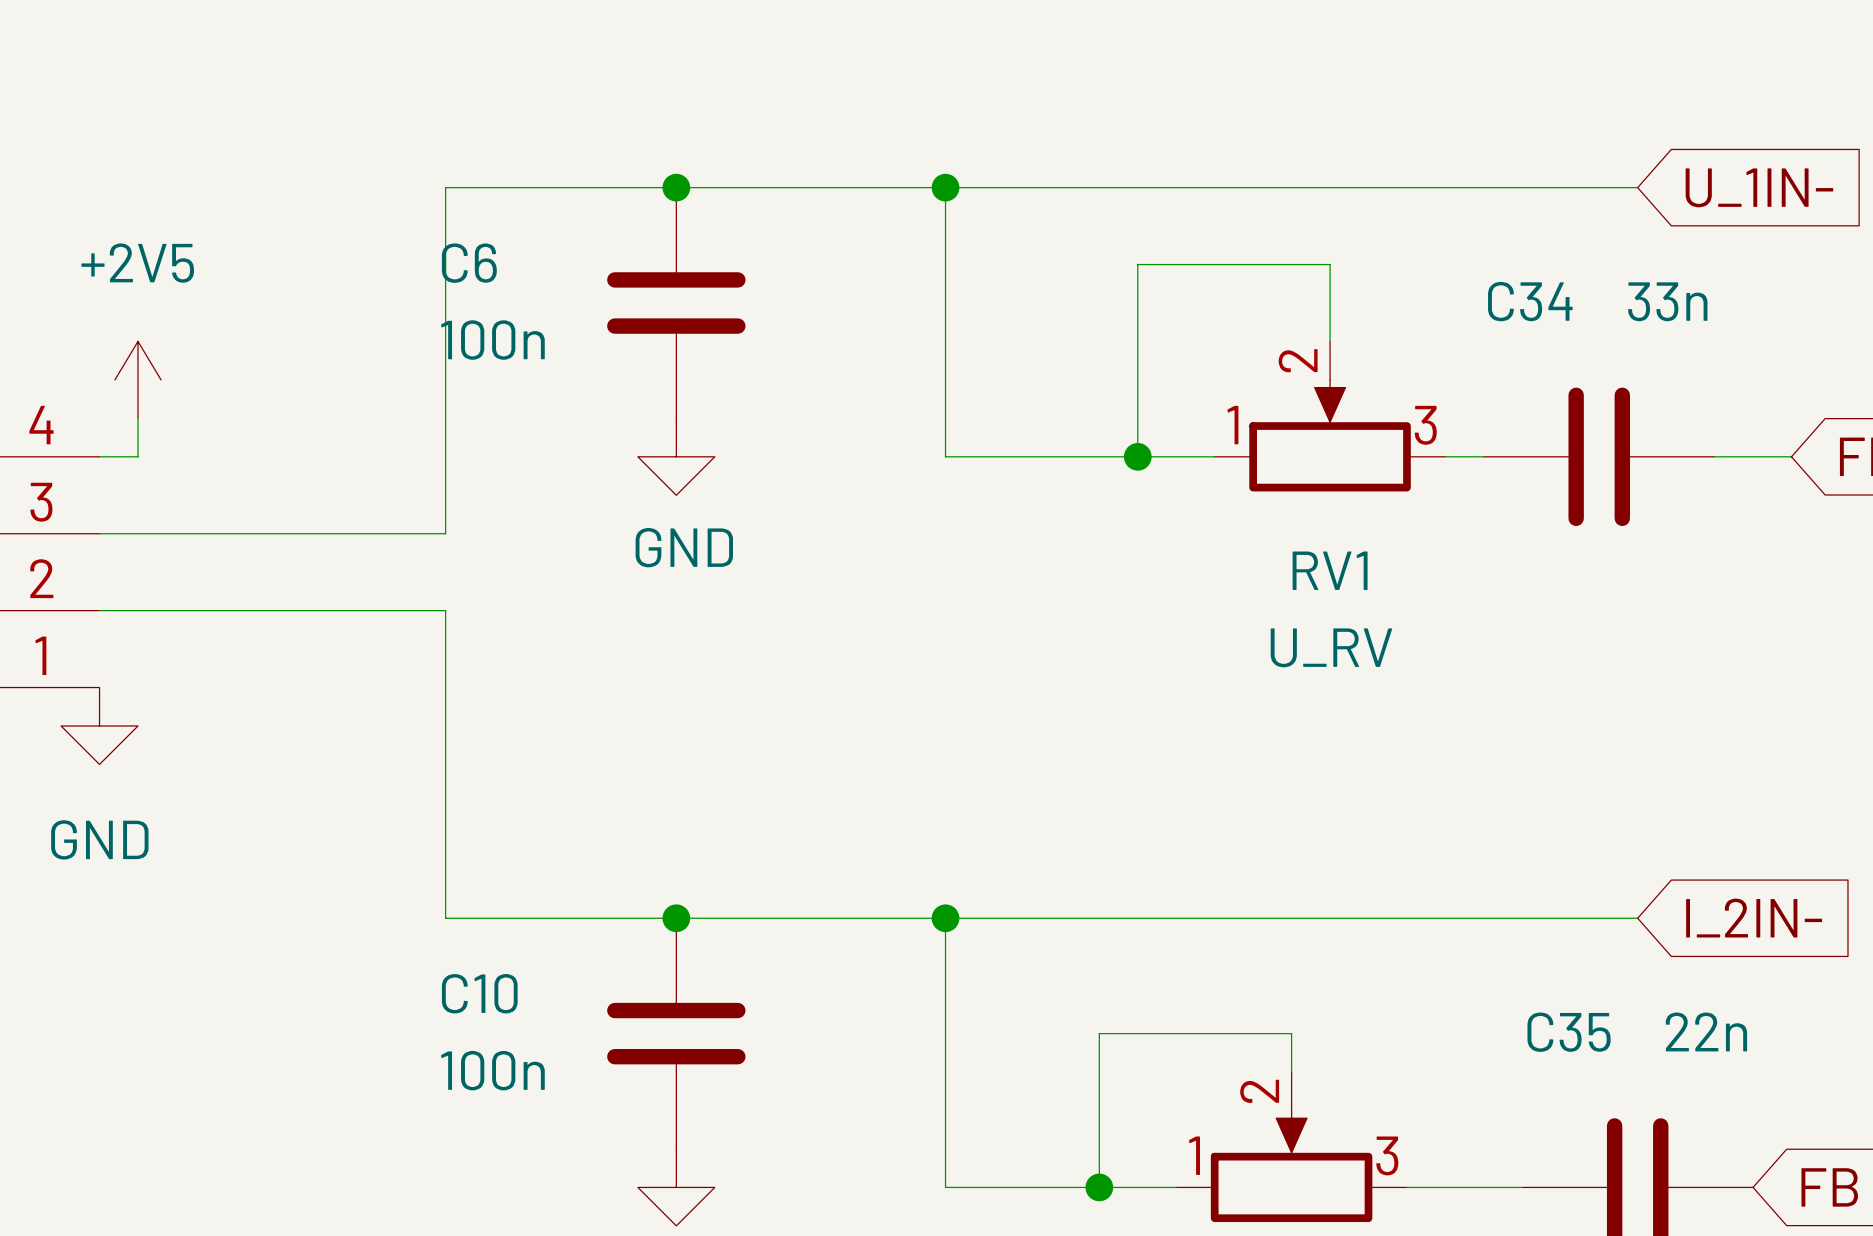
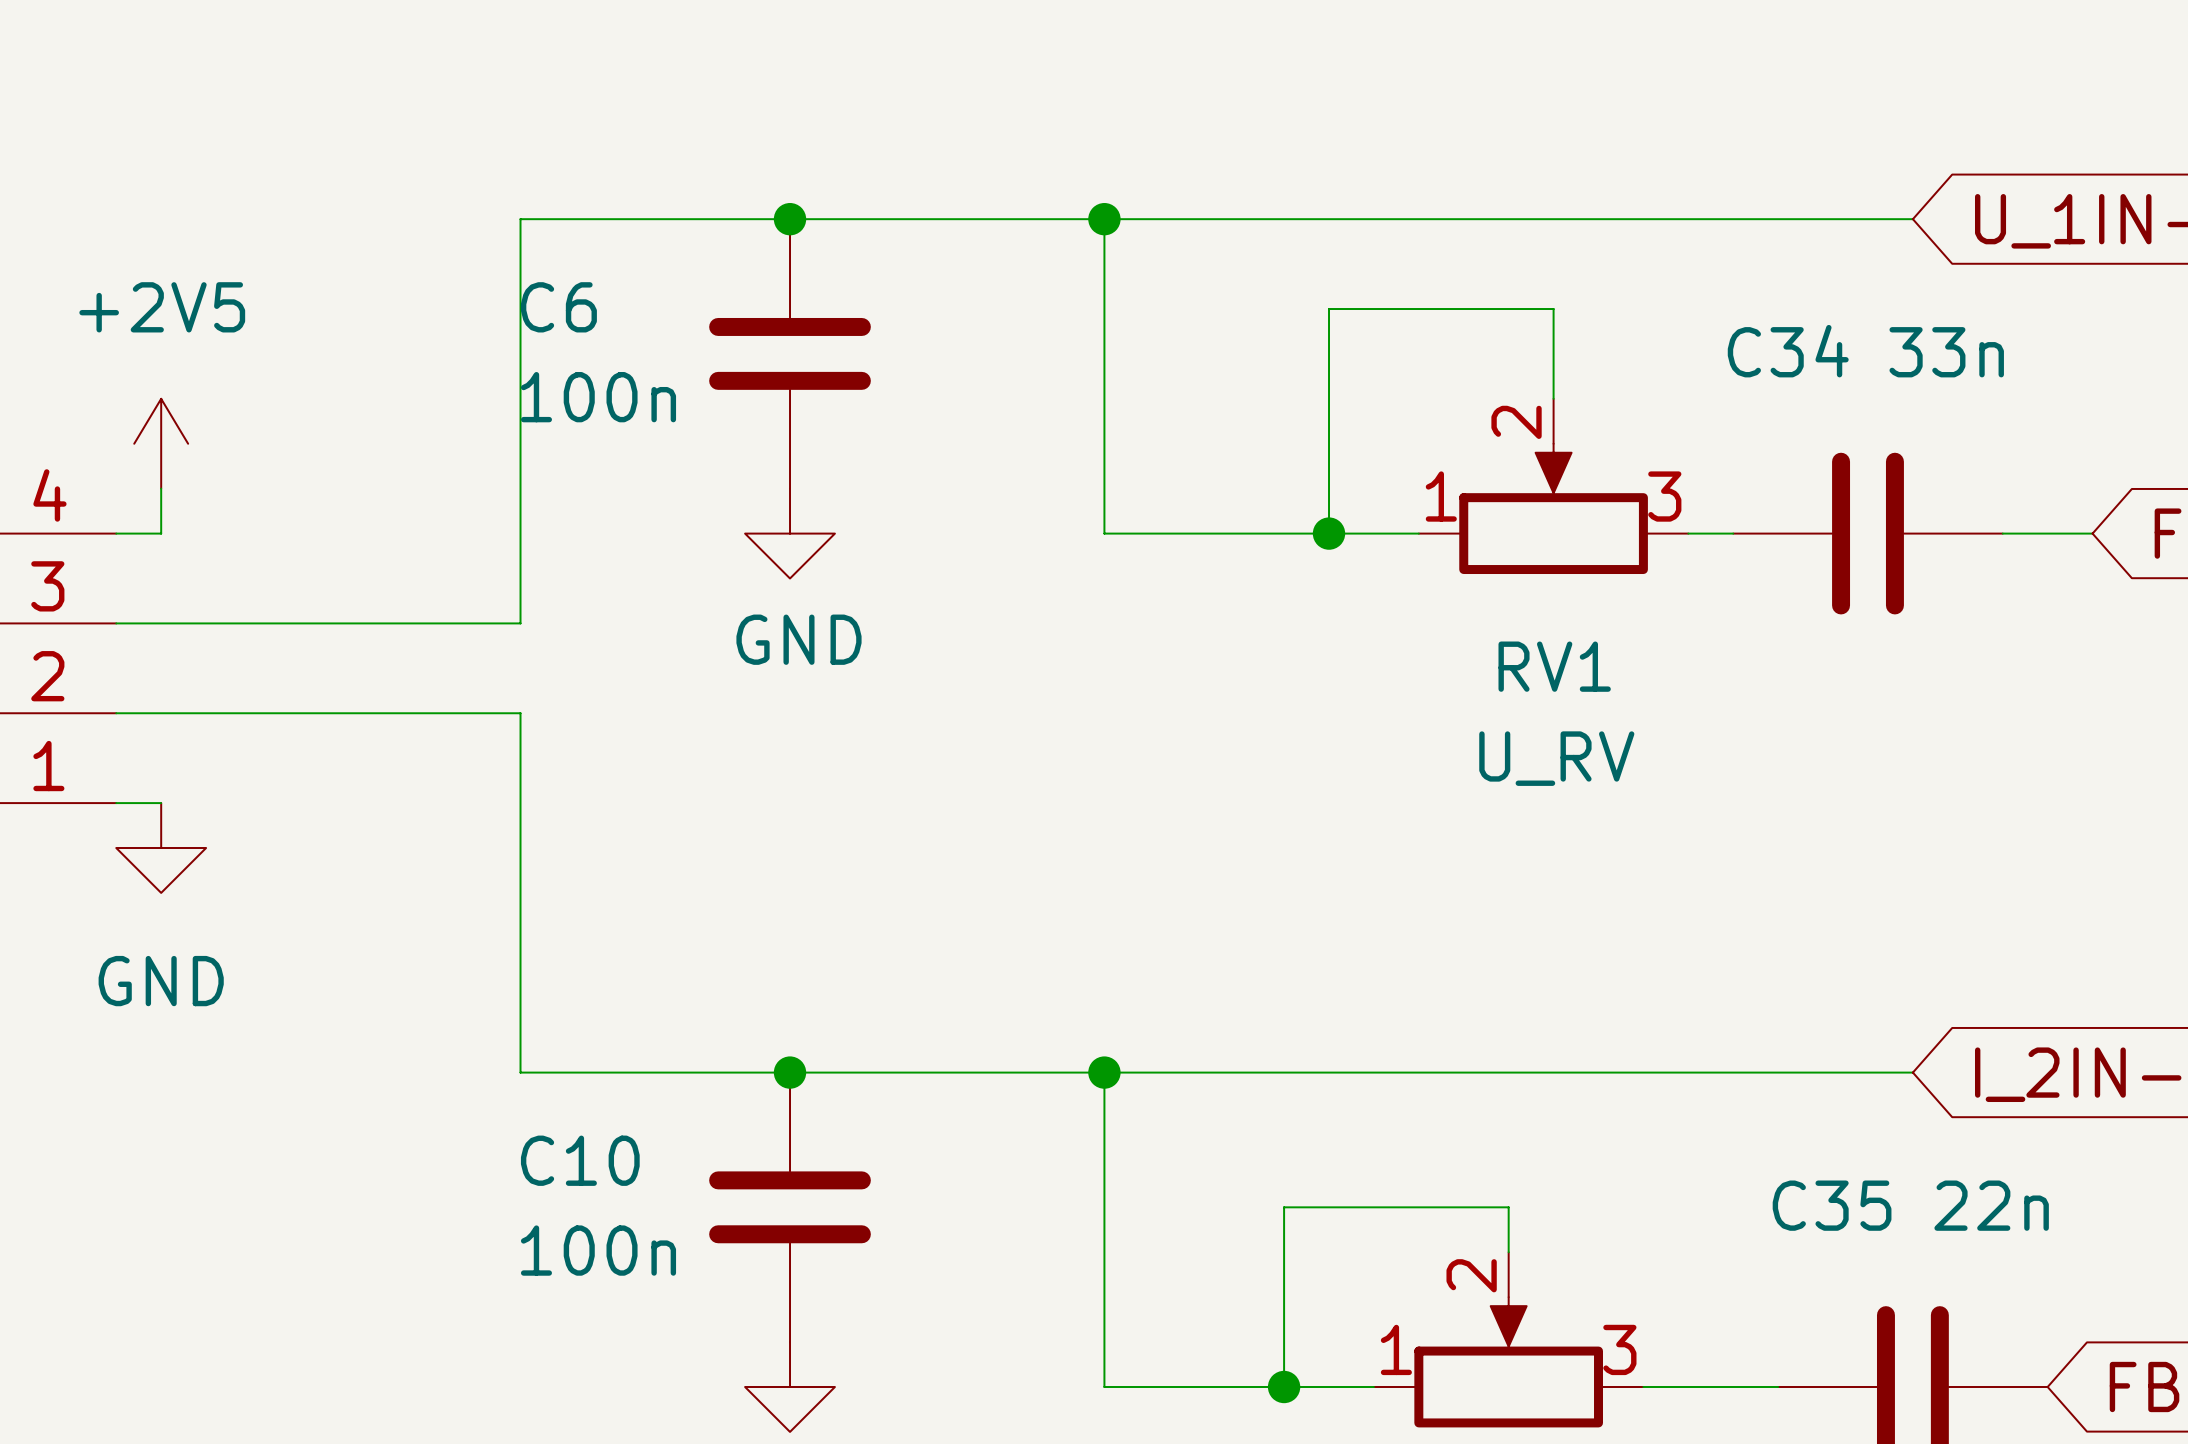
wire: none -> (116, 803) (161, 803)
power symbol position: GND (99, 725) -> GND (161, 848)

